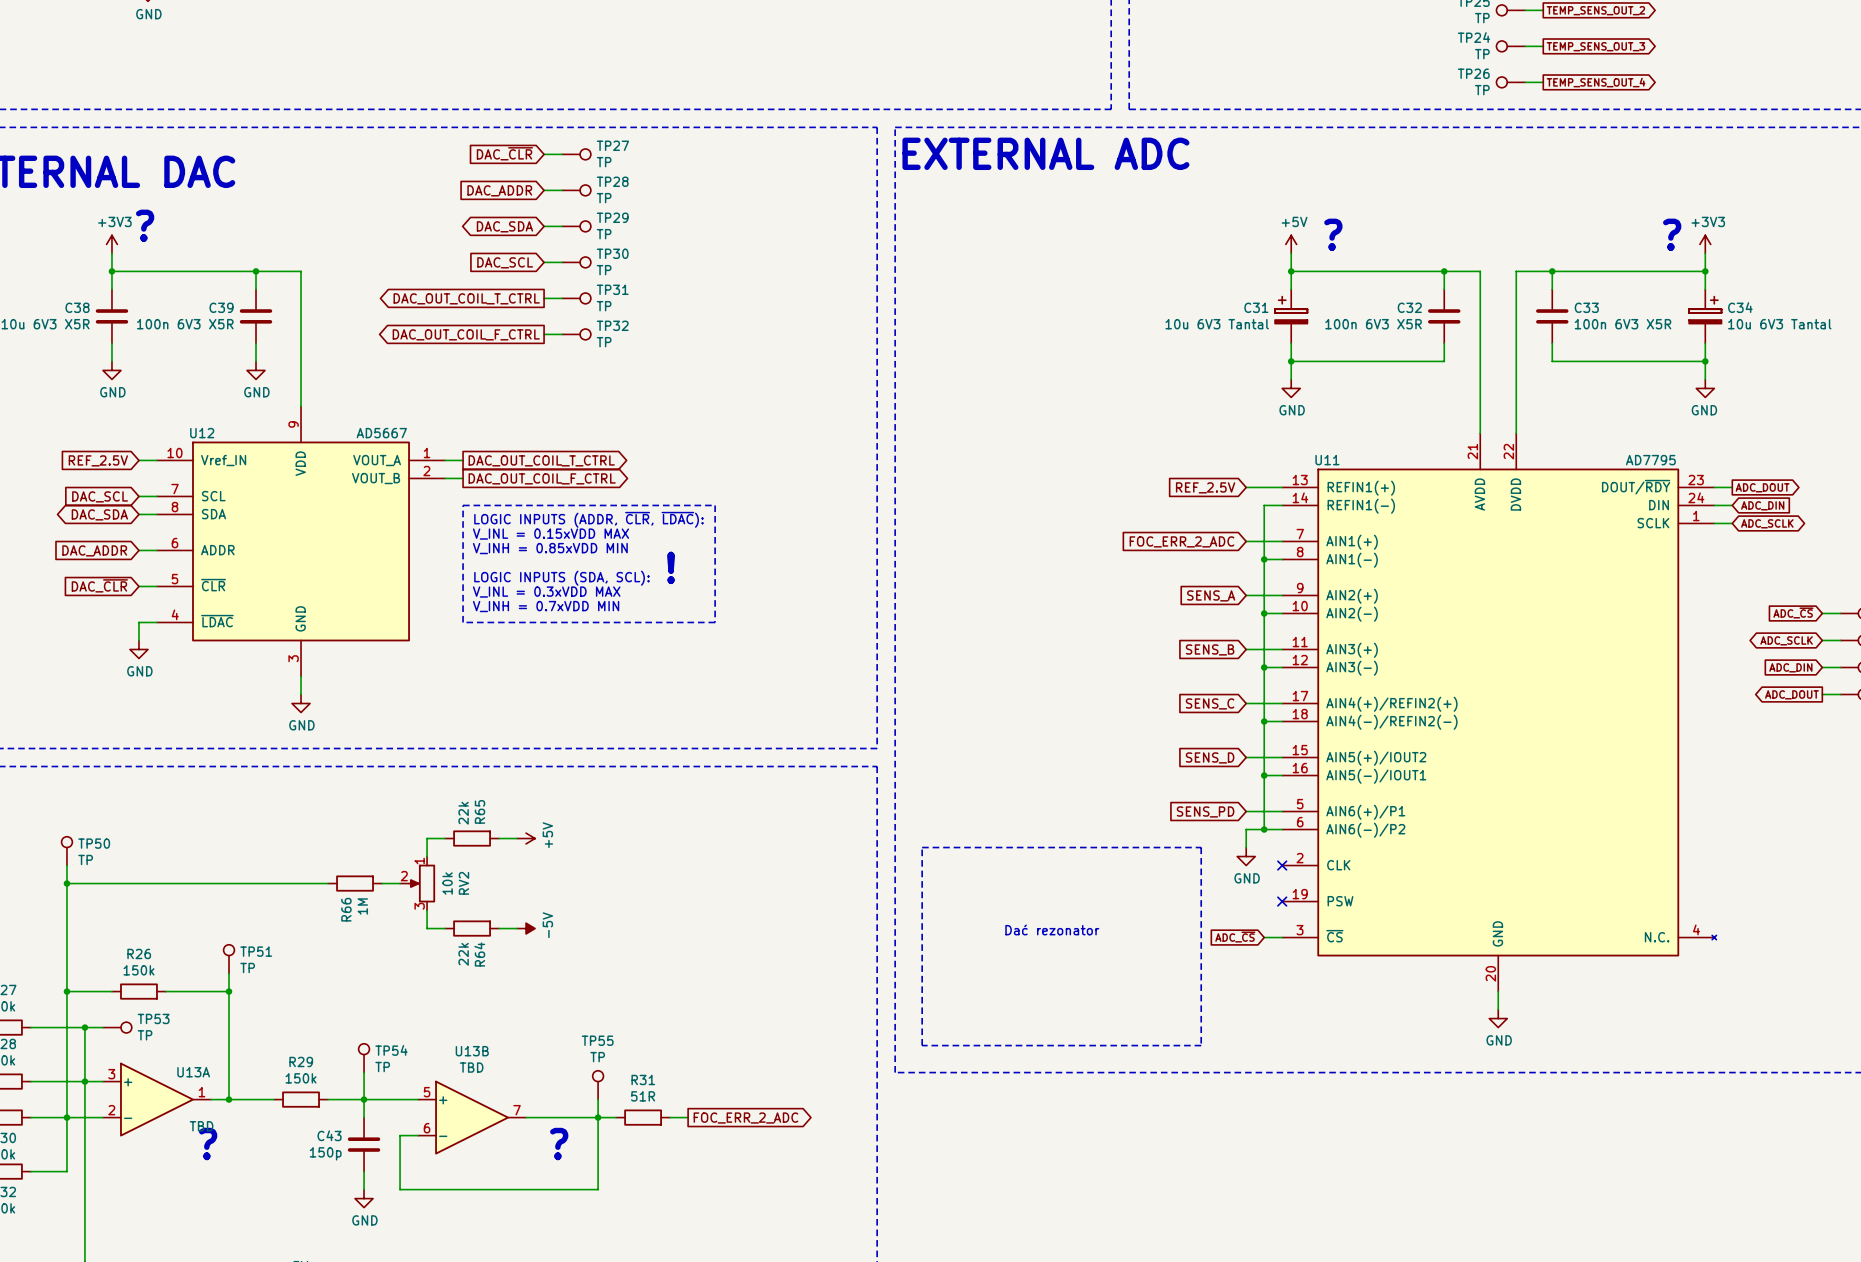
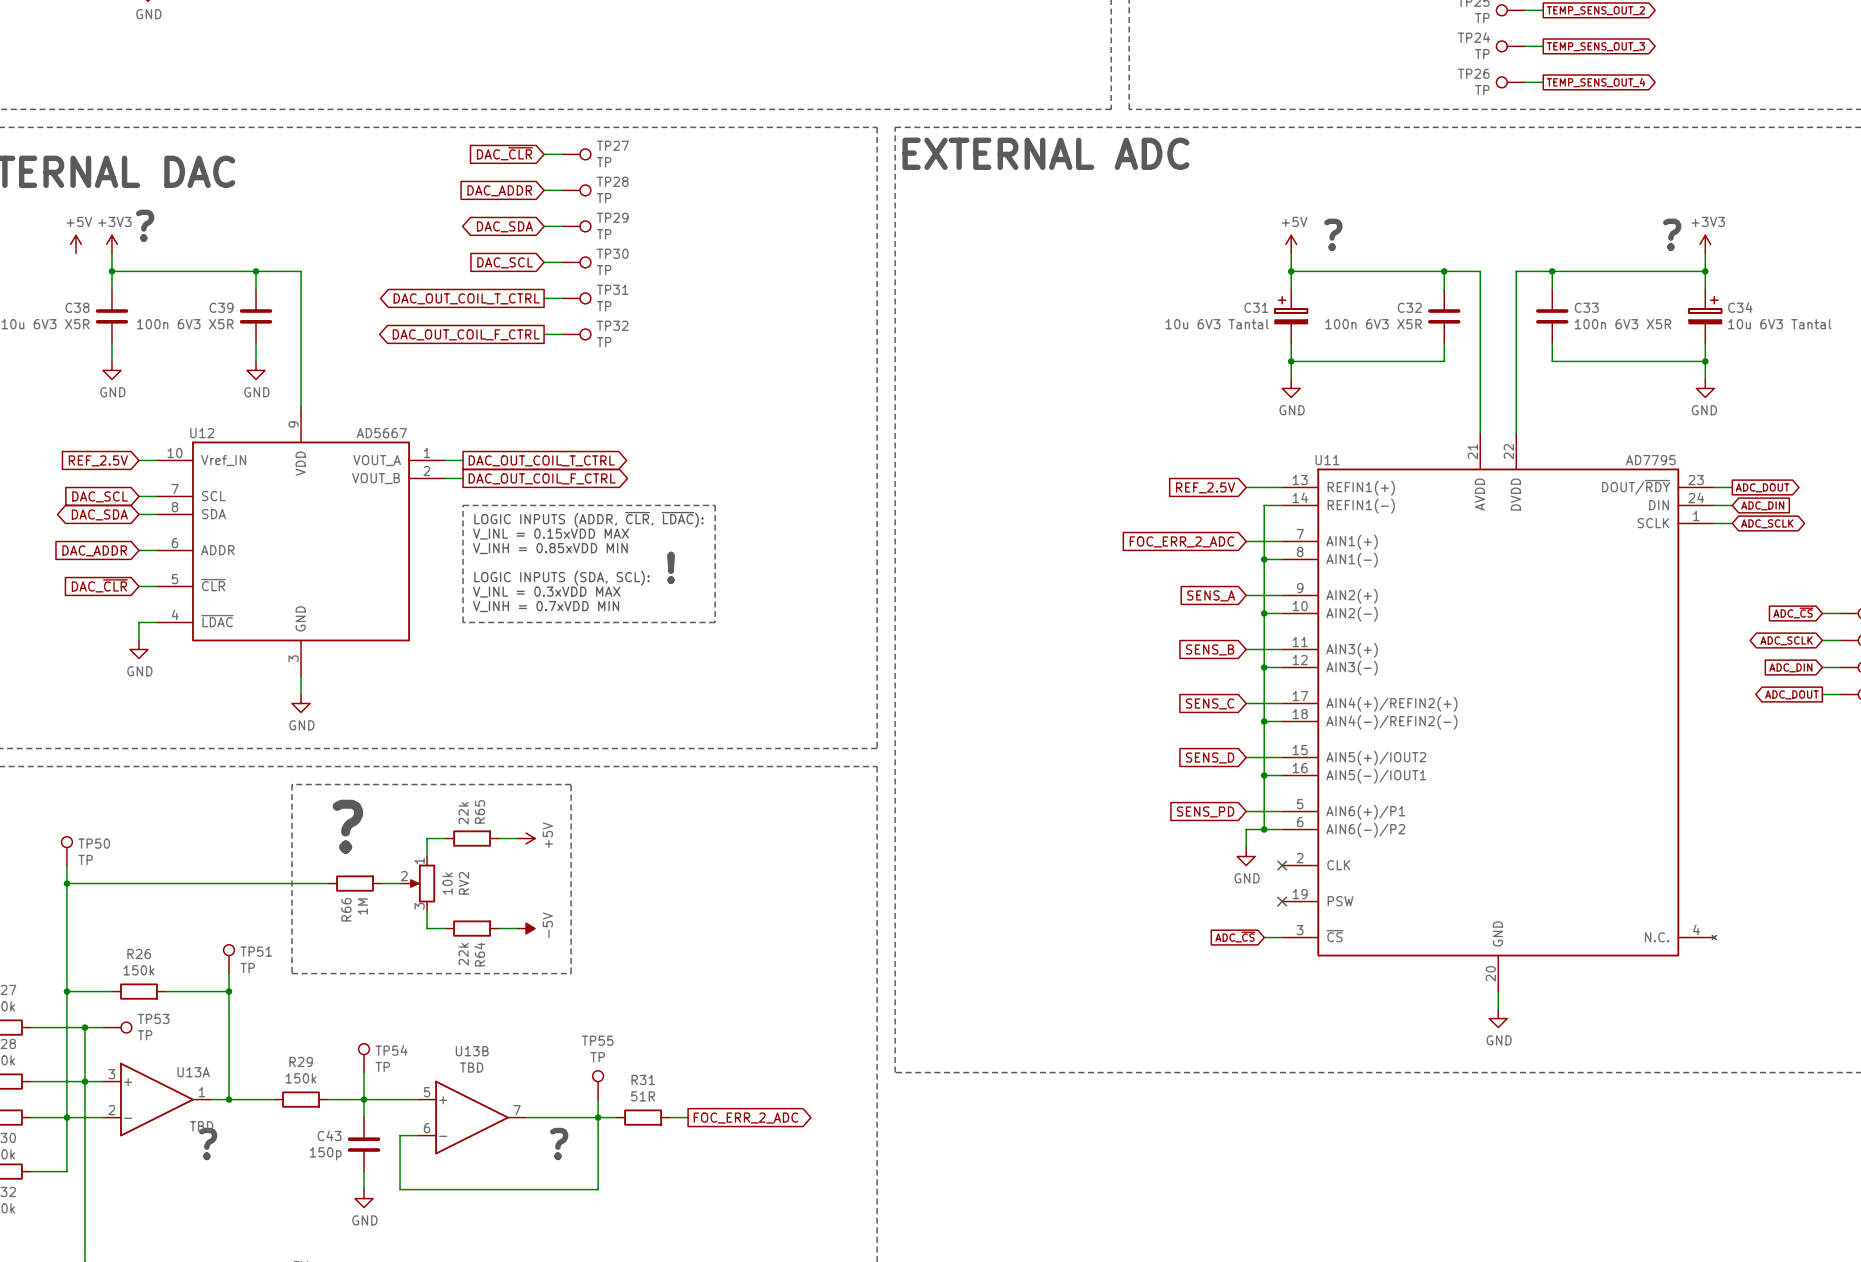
power symbol: none -> +5V (75, 244)
line: none -> (292, 784) (571, 784) (571, 973) (292, 973) (292, 784)
text: none -> ? (347, 826)
line: (922, 847) (1201, 847) (1201, 1045) (922, 1045) (922, 847) -> none
text: Dać rezonator (1052, 929) -> none

